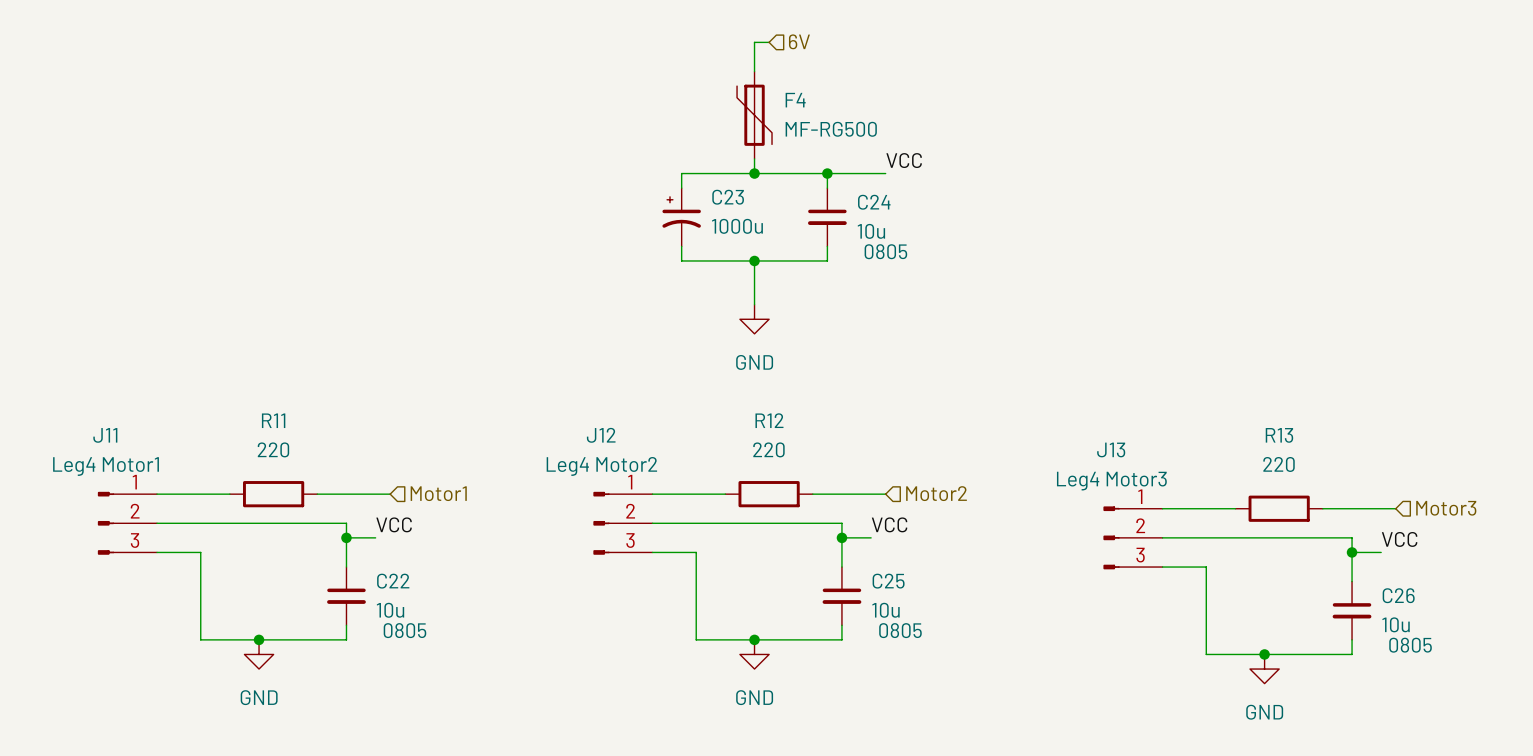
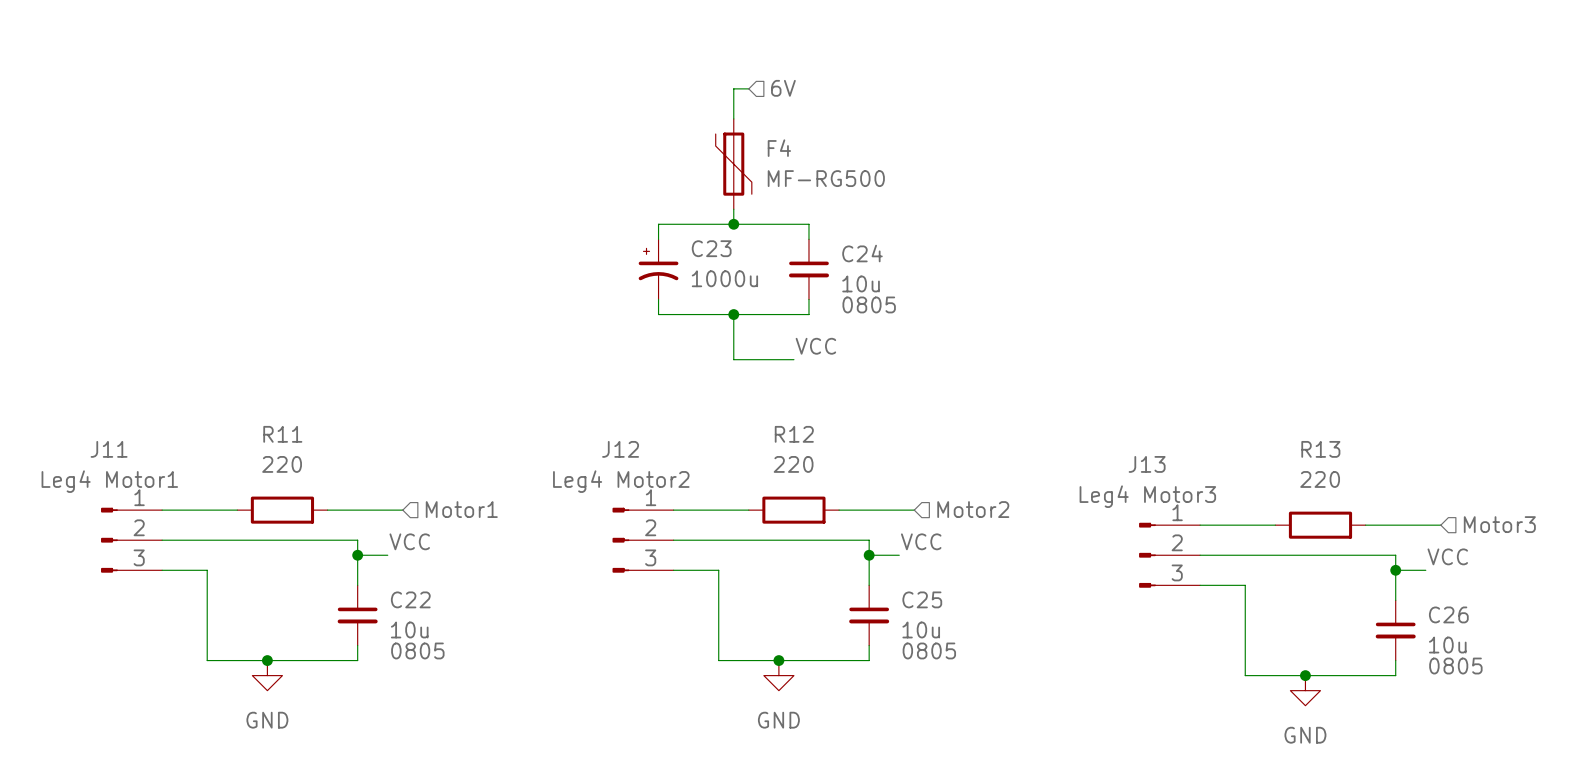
hierarchical label position: 6V (799, 41) -> 6V (783, 88)
wire: (769, 42) (754, 42) (754, 71) -> (748, 88) (733, 88) (733, 118)
F4 position: (754, 115) -> (733, 164)
wire: (754, 158) (754, 173) -> (733, 209) (733, 224)
label position: VCC (904, 160) -> VCC (815, 346)
junction: (754, 173) -> none
wire: (827, 173) (827, 188) -> none
junction: (827, 173) -> none
wire: (885, 173) (681, 173) (681, 188) -> none
C23 position: (681, 217) -> (658, 269)
junction: none -> (733, 224)
C24 position: (827, 217) -> (808, 269)
wire: none -> (658, 239) (658, 224) (808, 224) (808, 239)
wire: (681, 246) (681, 260) (827, 260) (827, 246) -> (658, 299) (658, 314) (808, 314) (808, 299)
wire: (754, 260) (754, 304) -> none
junction: (754, 260) -> none
wire: none -> (733, 314) (733, 359) (793, 359)
junction: none -> (733, 314)
power symbol: GND (754, 319) -> none

